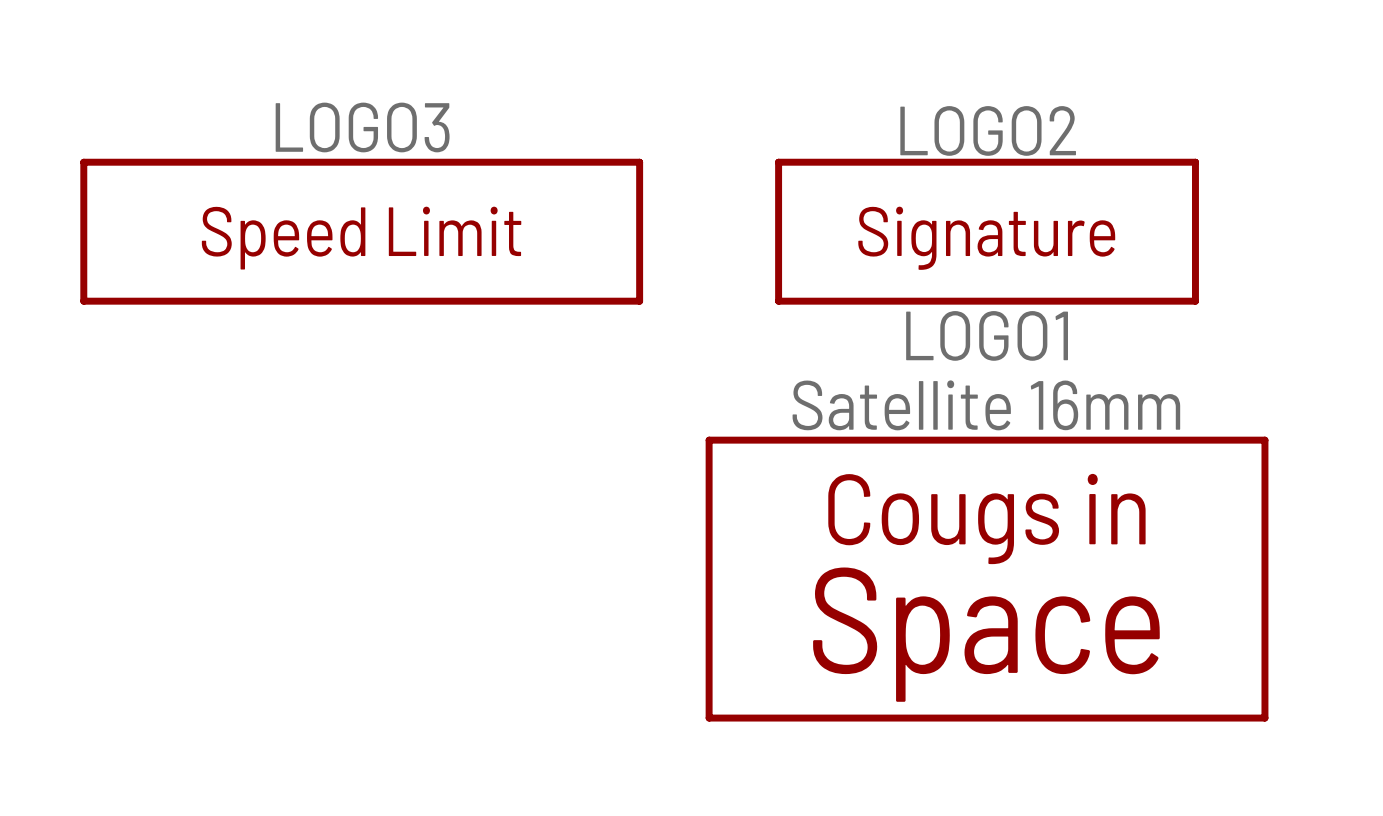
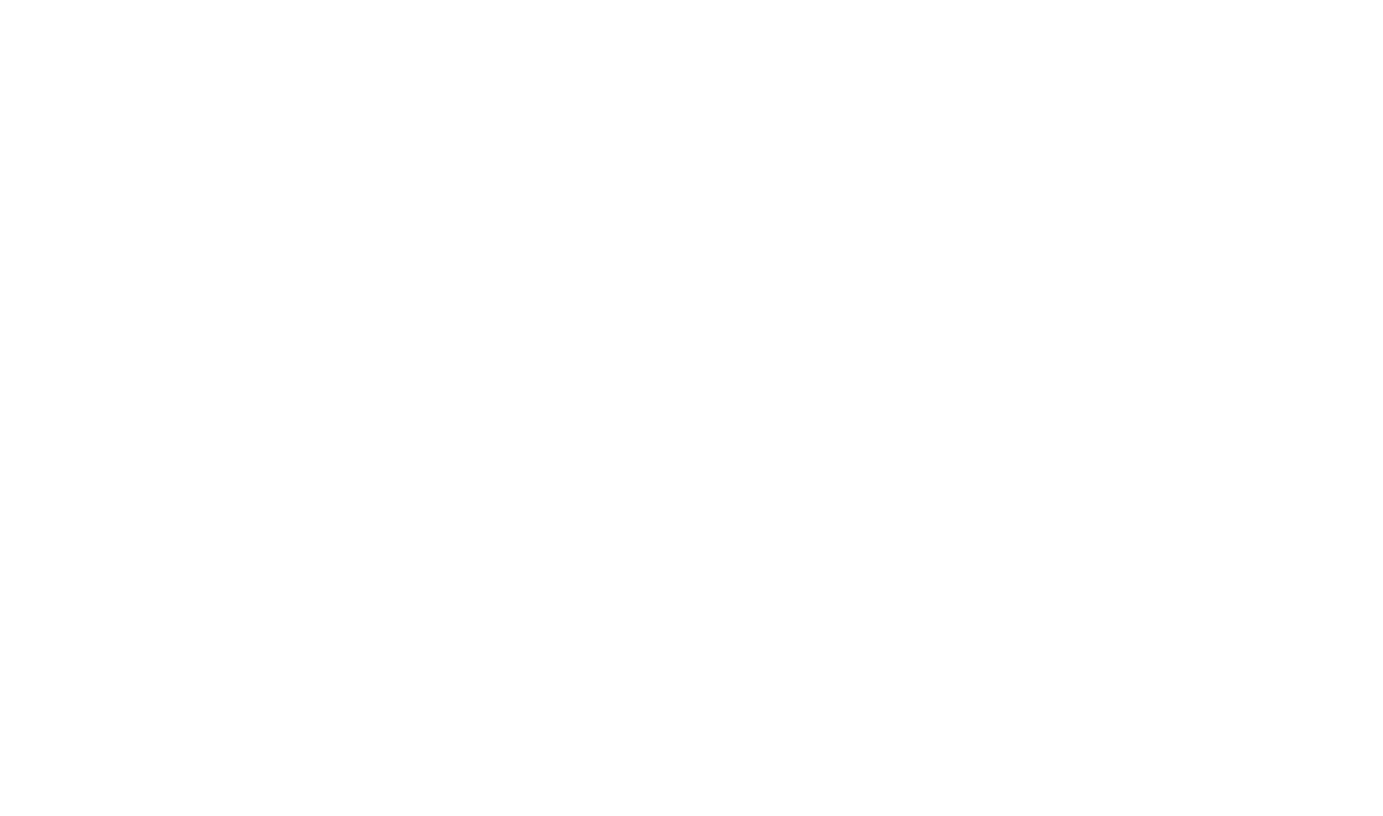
LOGO3: Speed Limit (361, 231) -> none
LOGO2: (987, 231) -> none
LOGO1: Satellite 16mm (987, 579) -> none

